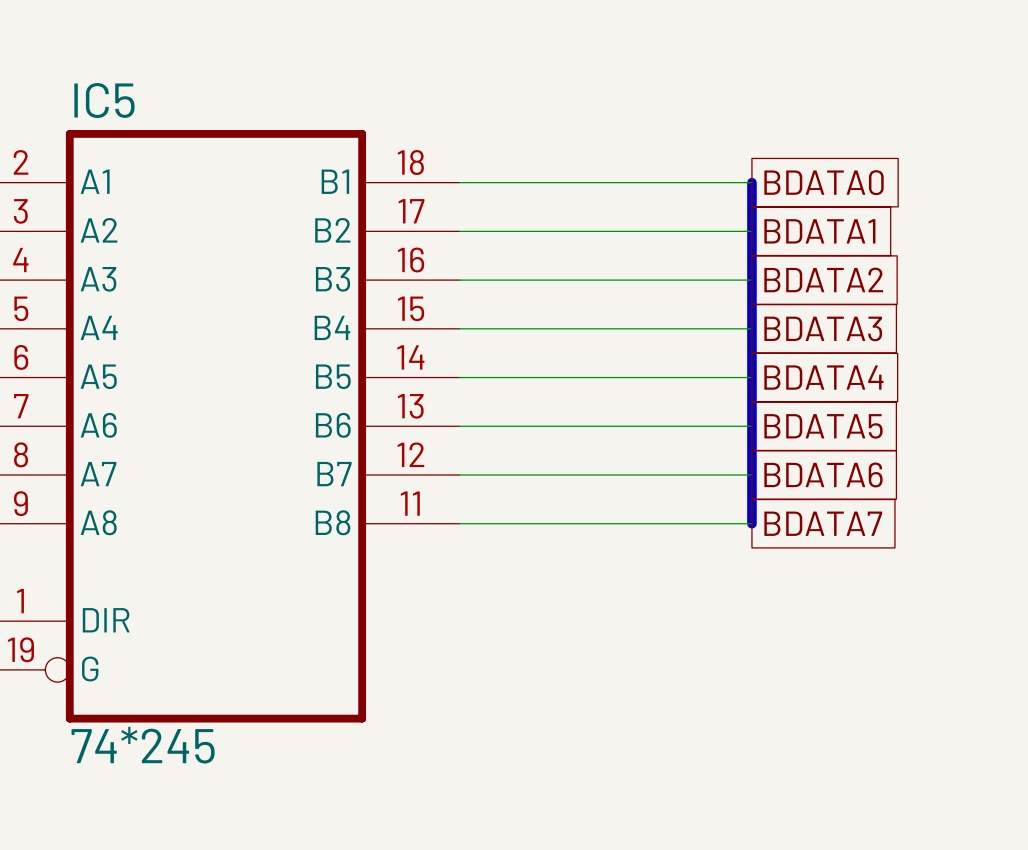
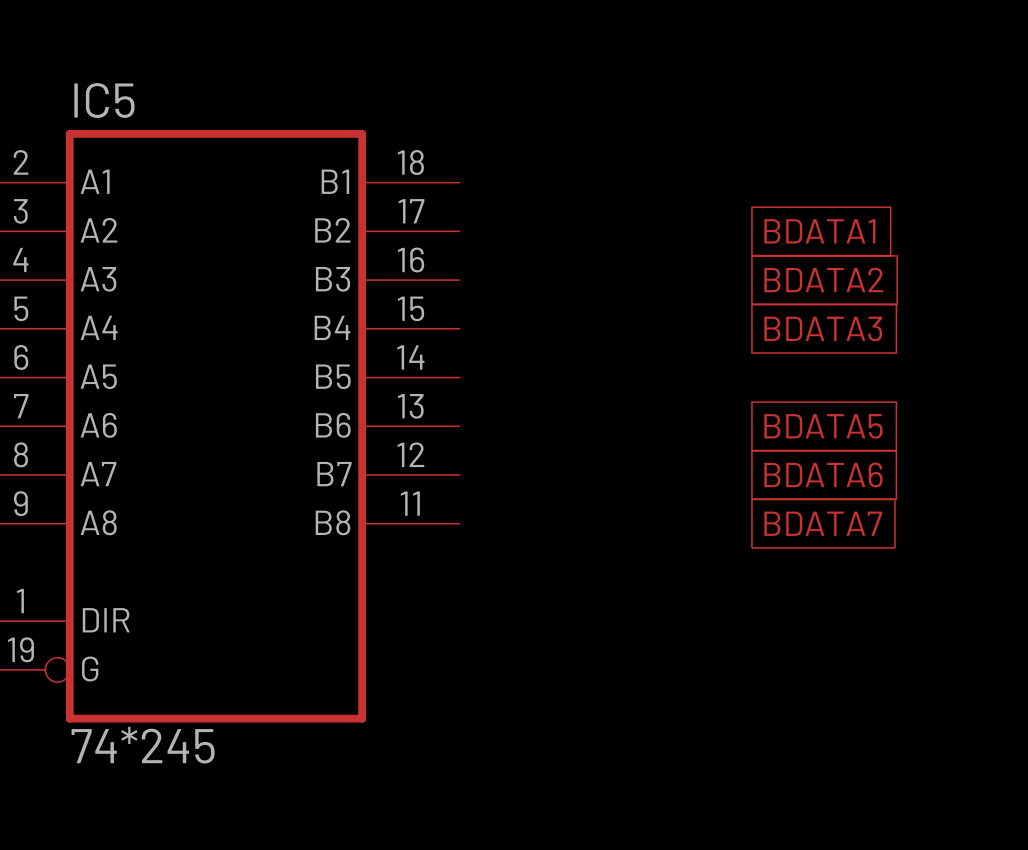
wire: (459, 182) (751, 182) -> none
line: (751, 182) (751, 523) -> none
global label: BDATA0 (824, 182) -> none
wire: (459, 231) (751, 231) -> none
wire: (459, 280) (751, 280) -> none
wire: (459, 328) (751, 328) -> none
wire: (459, 377) (751, 377) -> none
global label: BDATA4 (823, 377) -> none
wire: (459, 426) (751, 426) -> none
wire: (459, 475) (751, 475) -> none
wire: (459, 523) (751, 523) -> none

